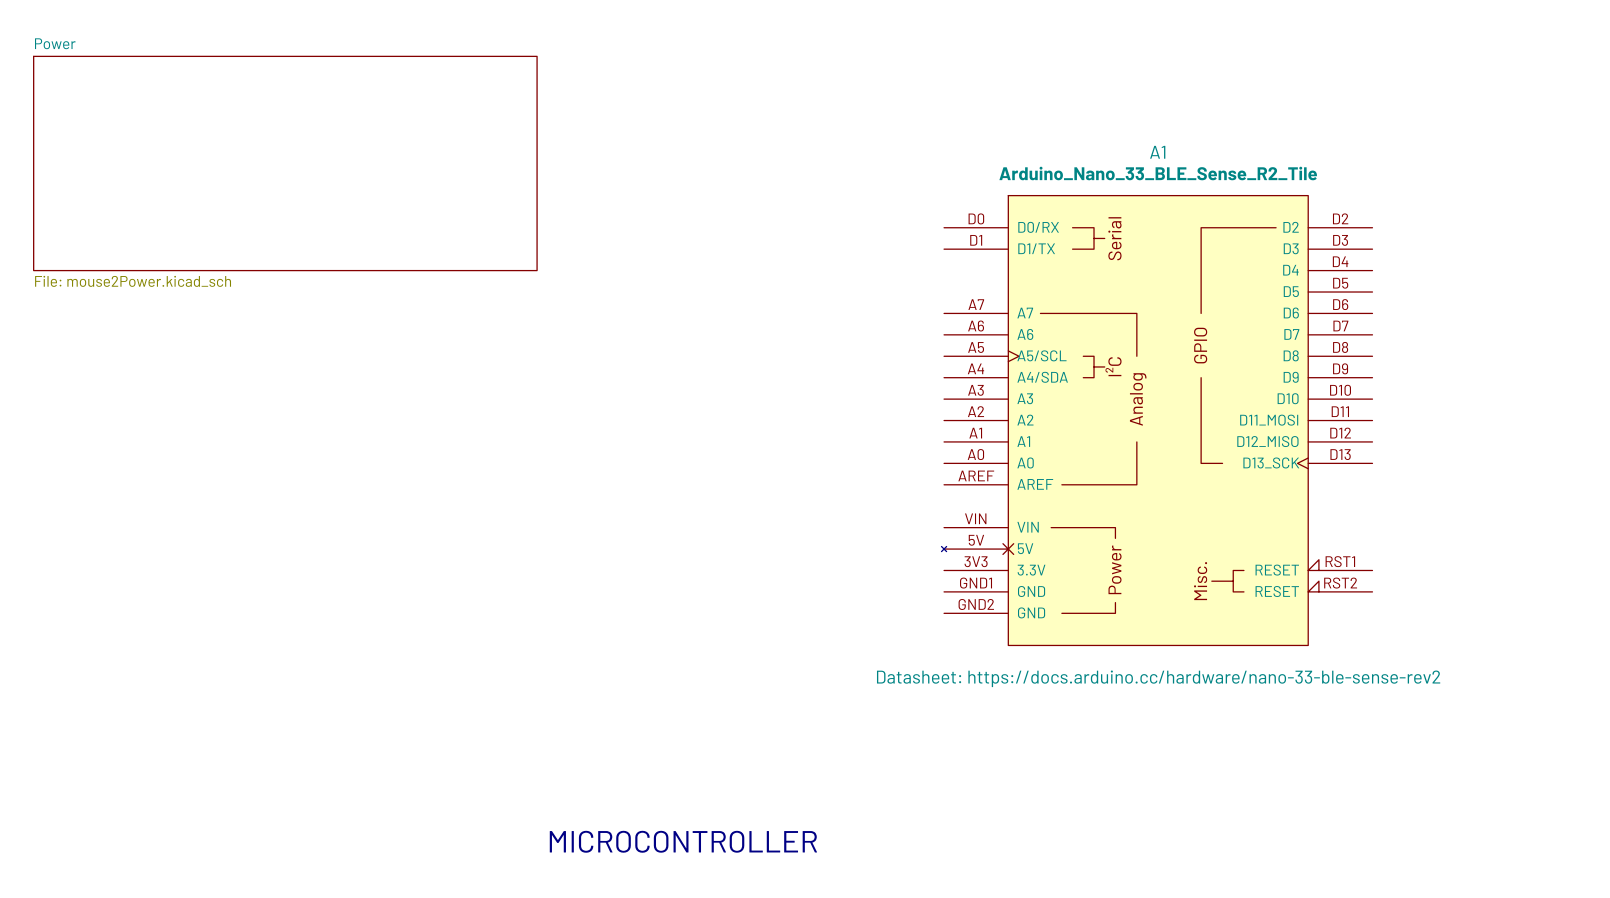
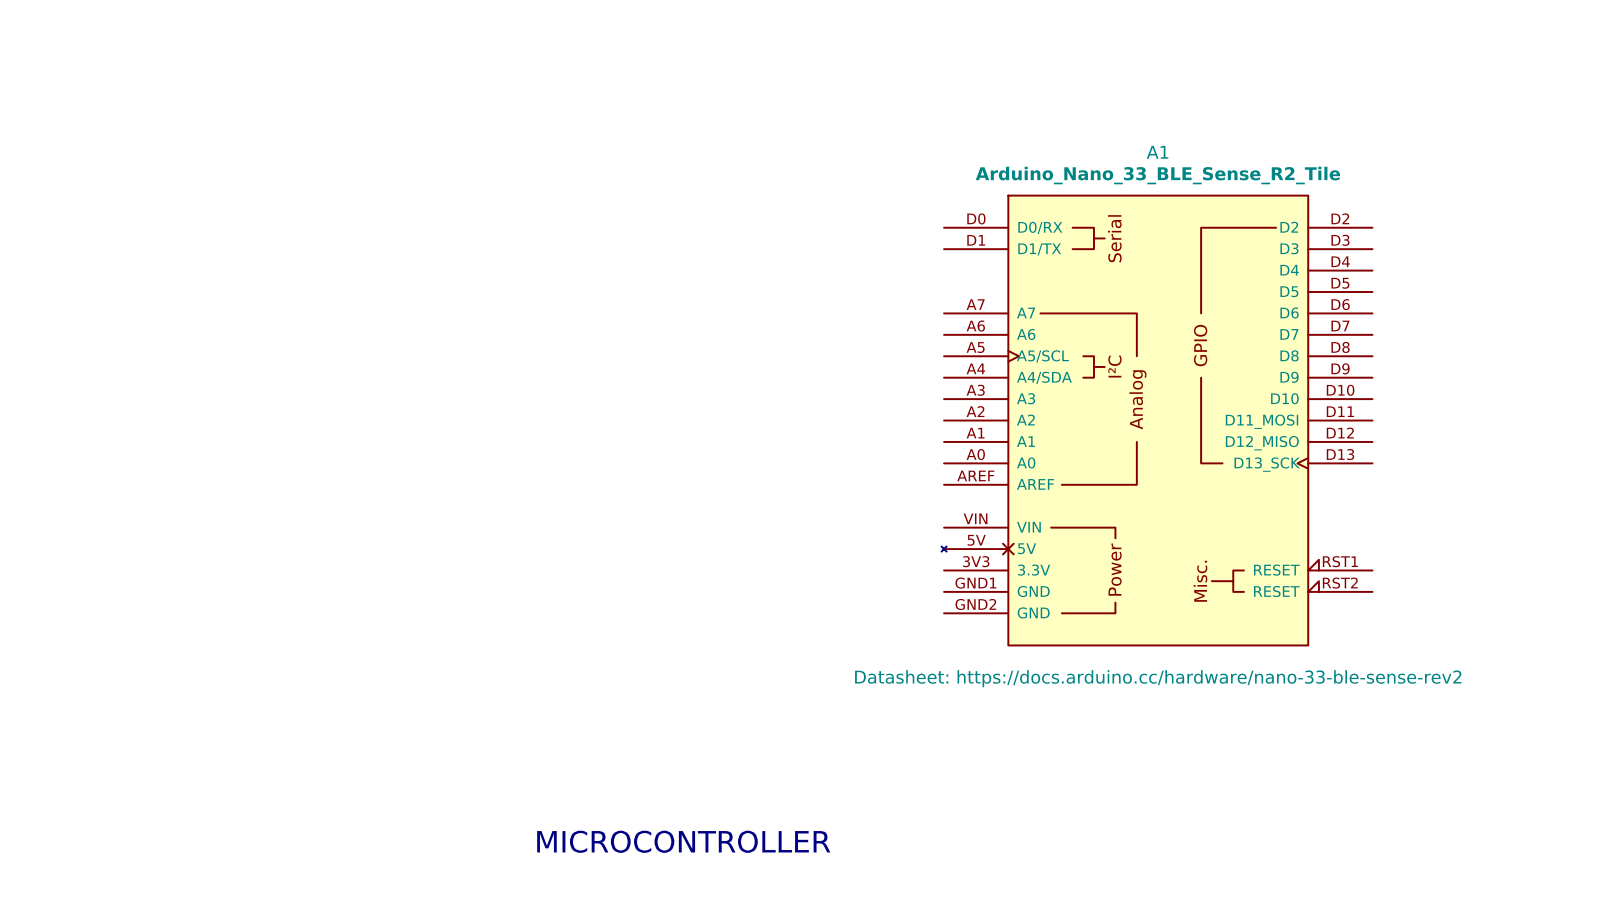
sheet Power: File: mouse2Power.kicad_sch (285, 163) -> none

